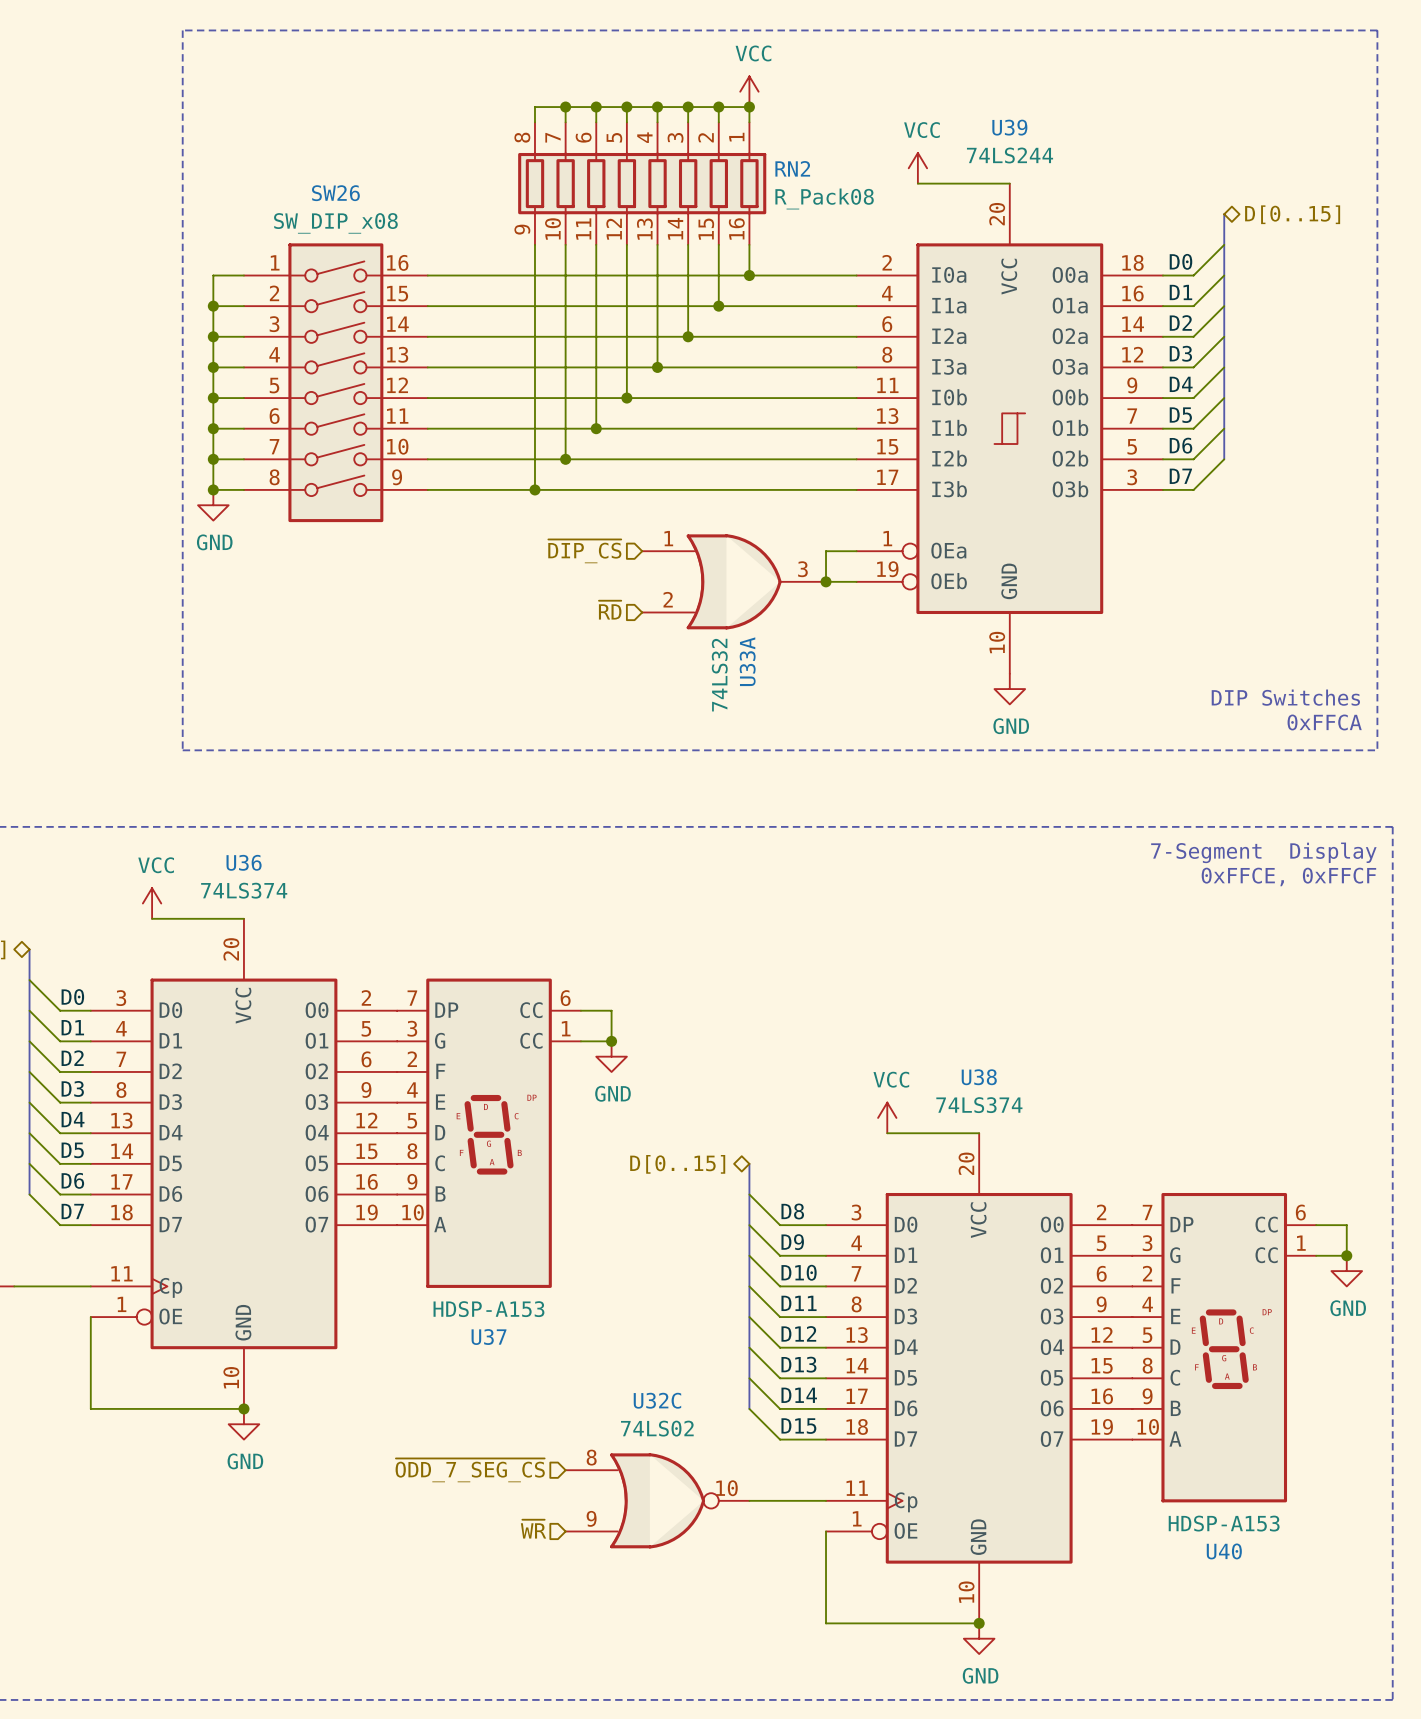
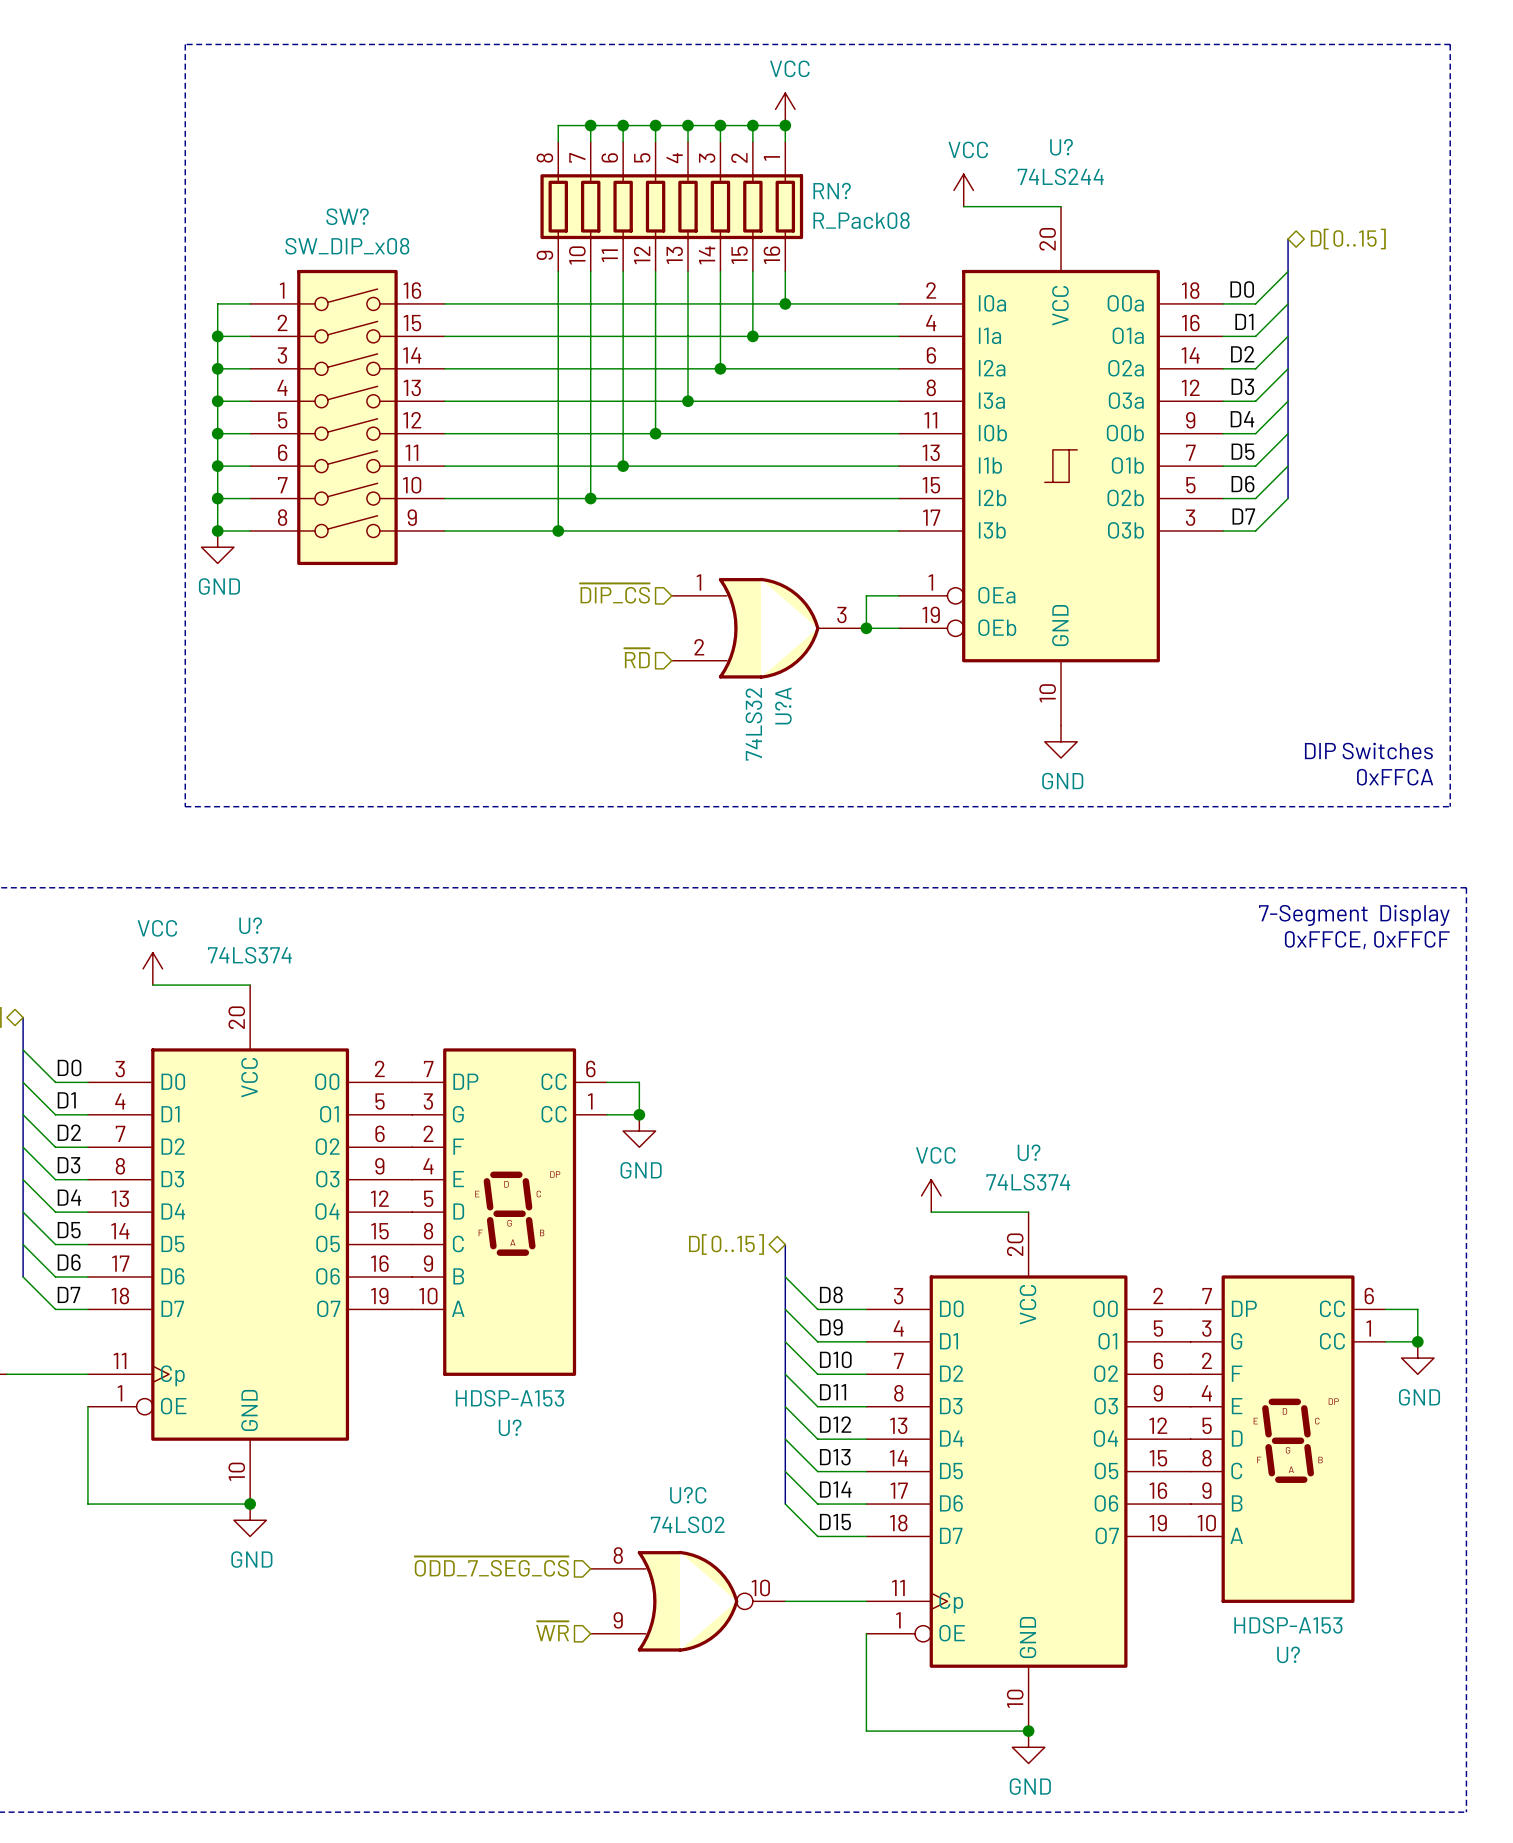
U39 name: U39 (1009, 127) -> U? (1061, 147)
RN2 name: RN2 (792, 168) -> RN? (832, 191)
SW26 name: SW26 (335, 193) -> SW? (347, 216)
U33A name: U33A (747, 661) -> U?A (783, 705)
U36 name: U36 (244, 862) -> U? (250, 925)
U38 name: U38 (979, 1077) -> U? (1029, 1152)
U37 name: U37 (489, 1337) -> U? (510, 1427)
U32C name: U32C (657, 1400) -> U?C (688, 1495)
U40 name: U40 (1224, 1551) -> U? (1288, 1654)

